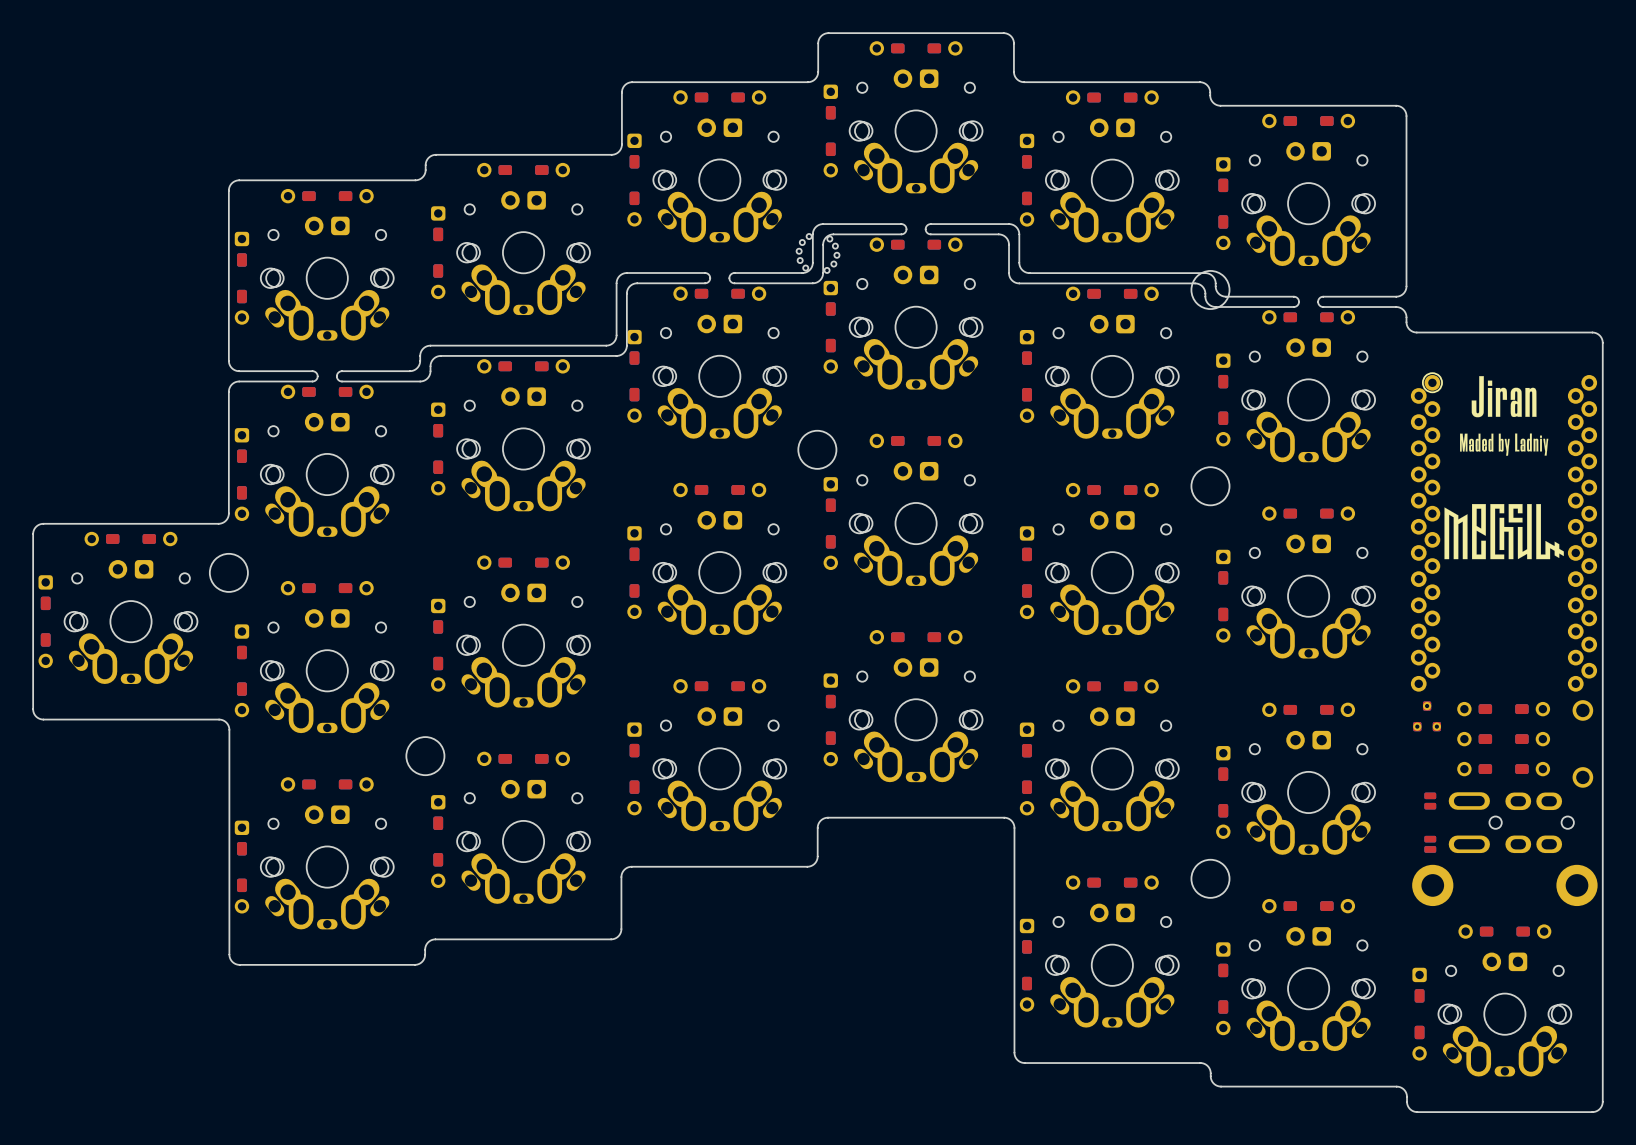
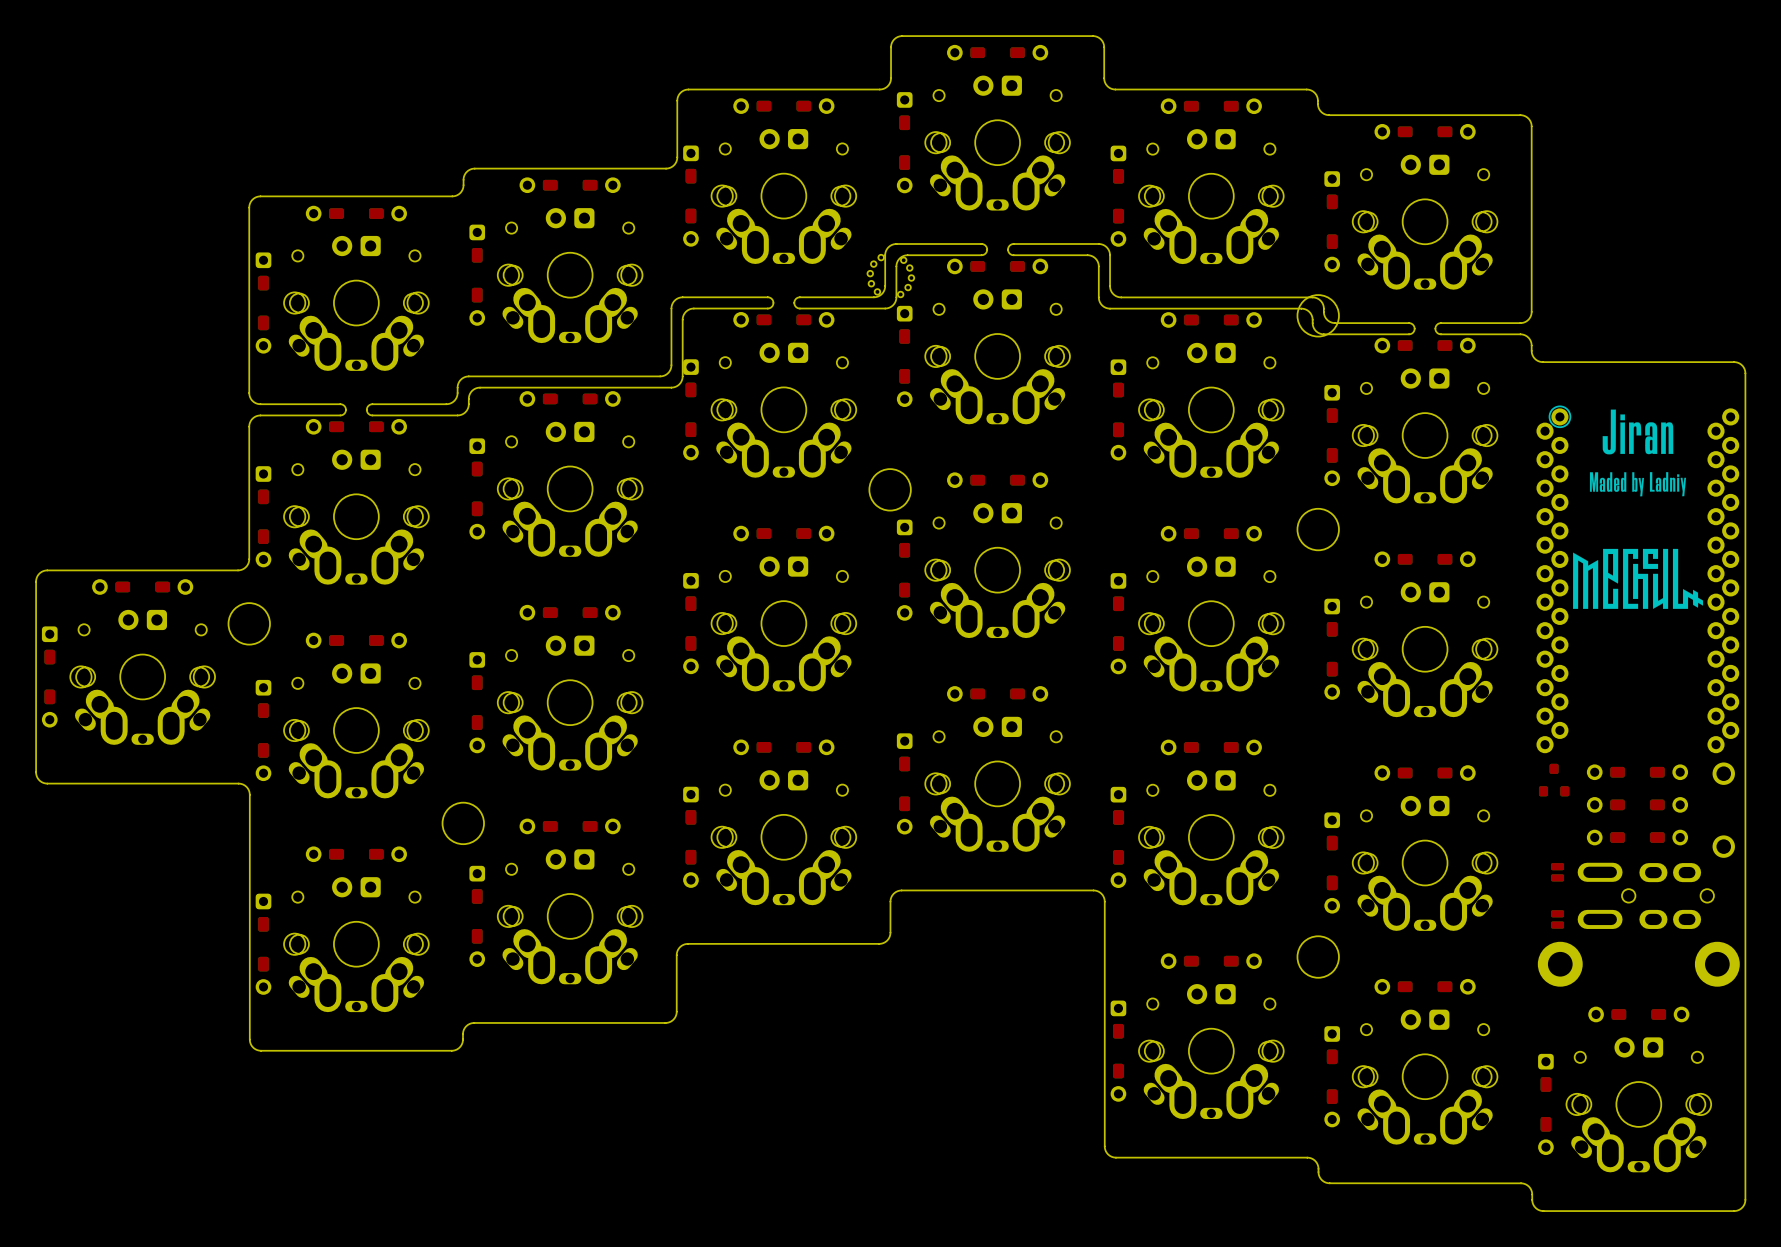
part footprint: [1413, 701, 1442, 732] -> [1538, 763, 1570, 797]

